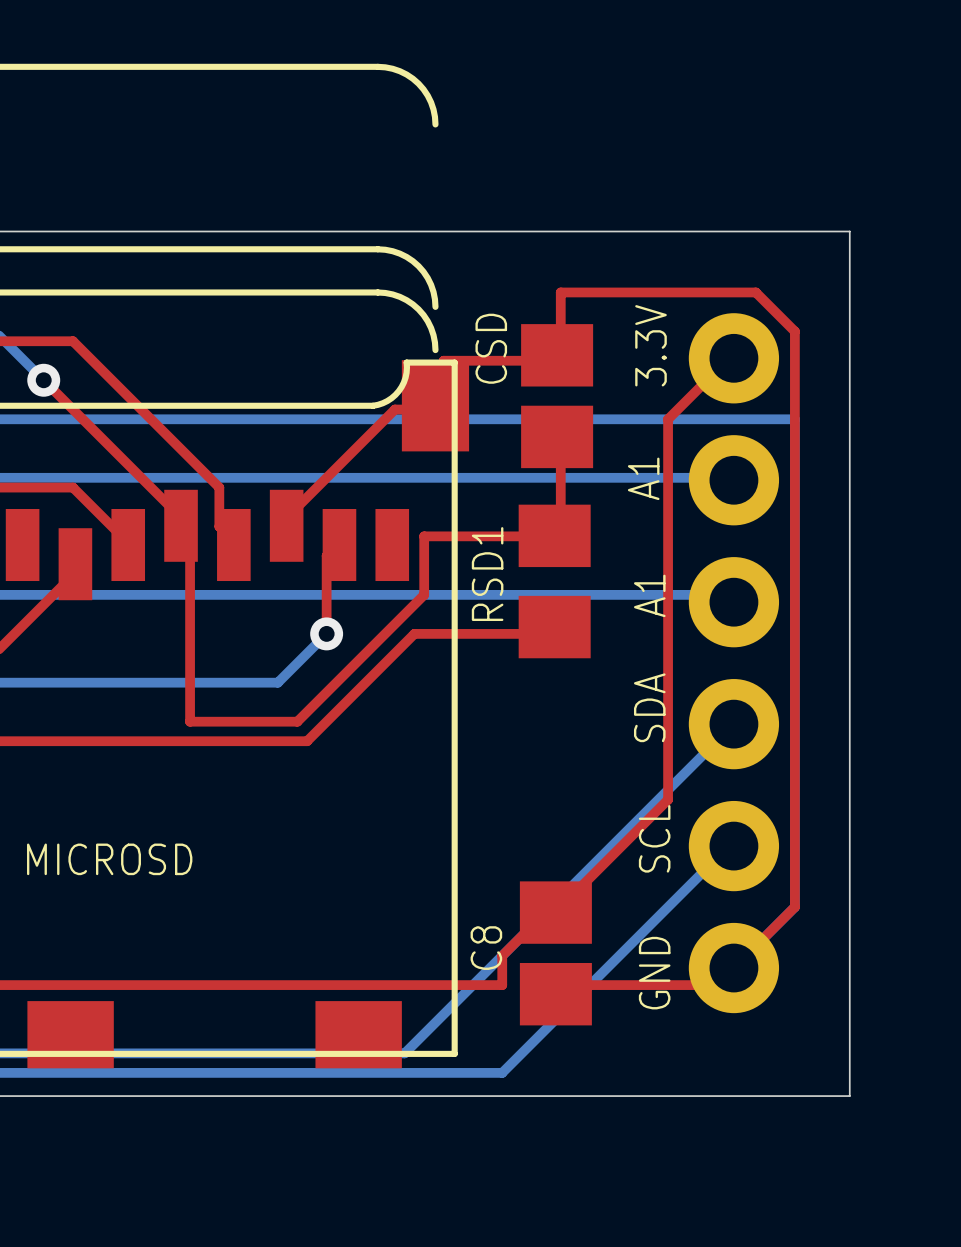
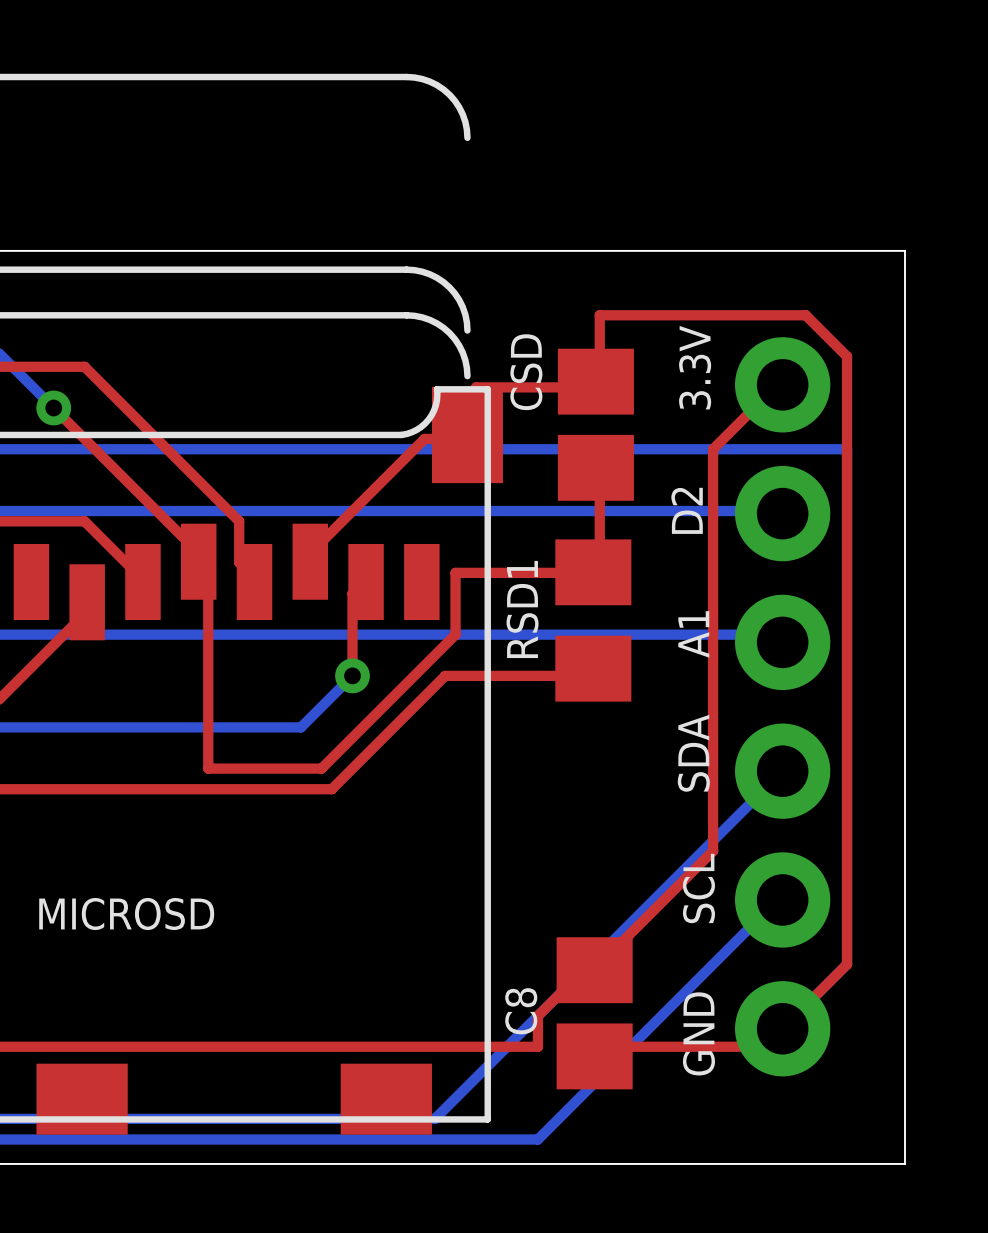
text: A1 (643, 478) -> D2 (687, 510)

